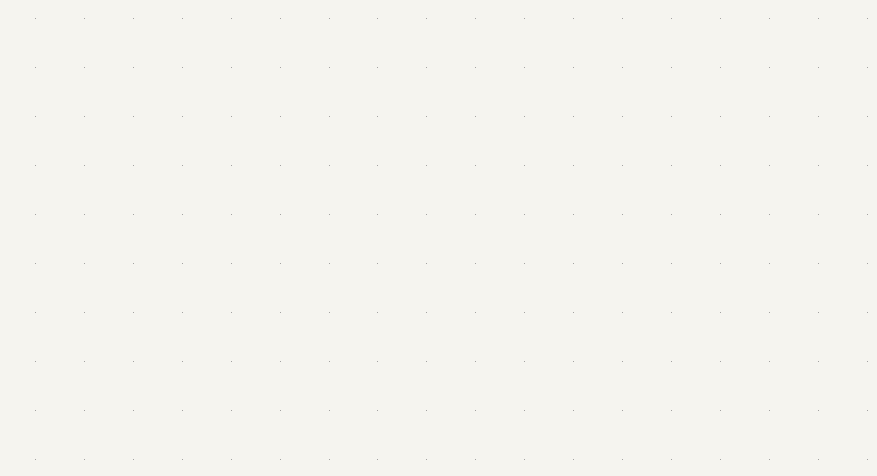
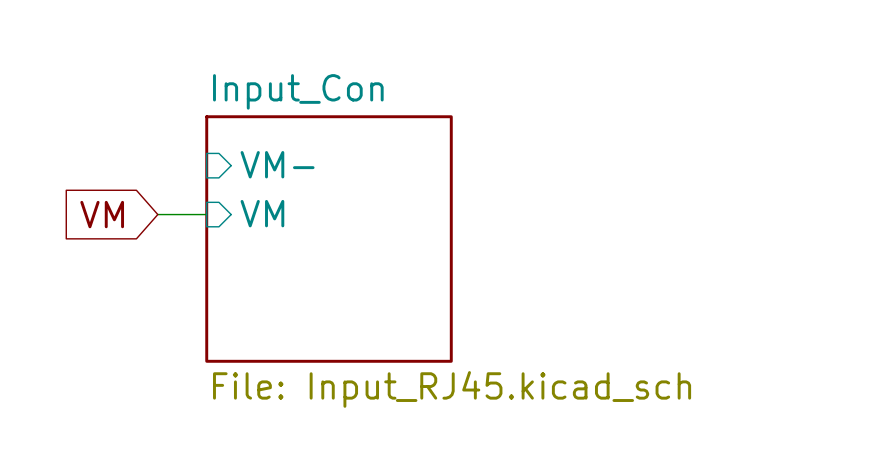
sheet pin: none -> VM- (277, 164)
sheet pin: none -> VM (262, 213)
global label: none -> VM (102, 214)
wire: none -> (157, 214) (206, 214)
sheet Input_Con: none -> File: Input_RJ45.kicad_sch (329, 239)

